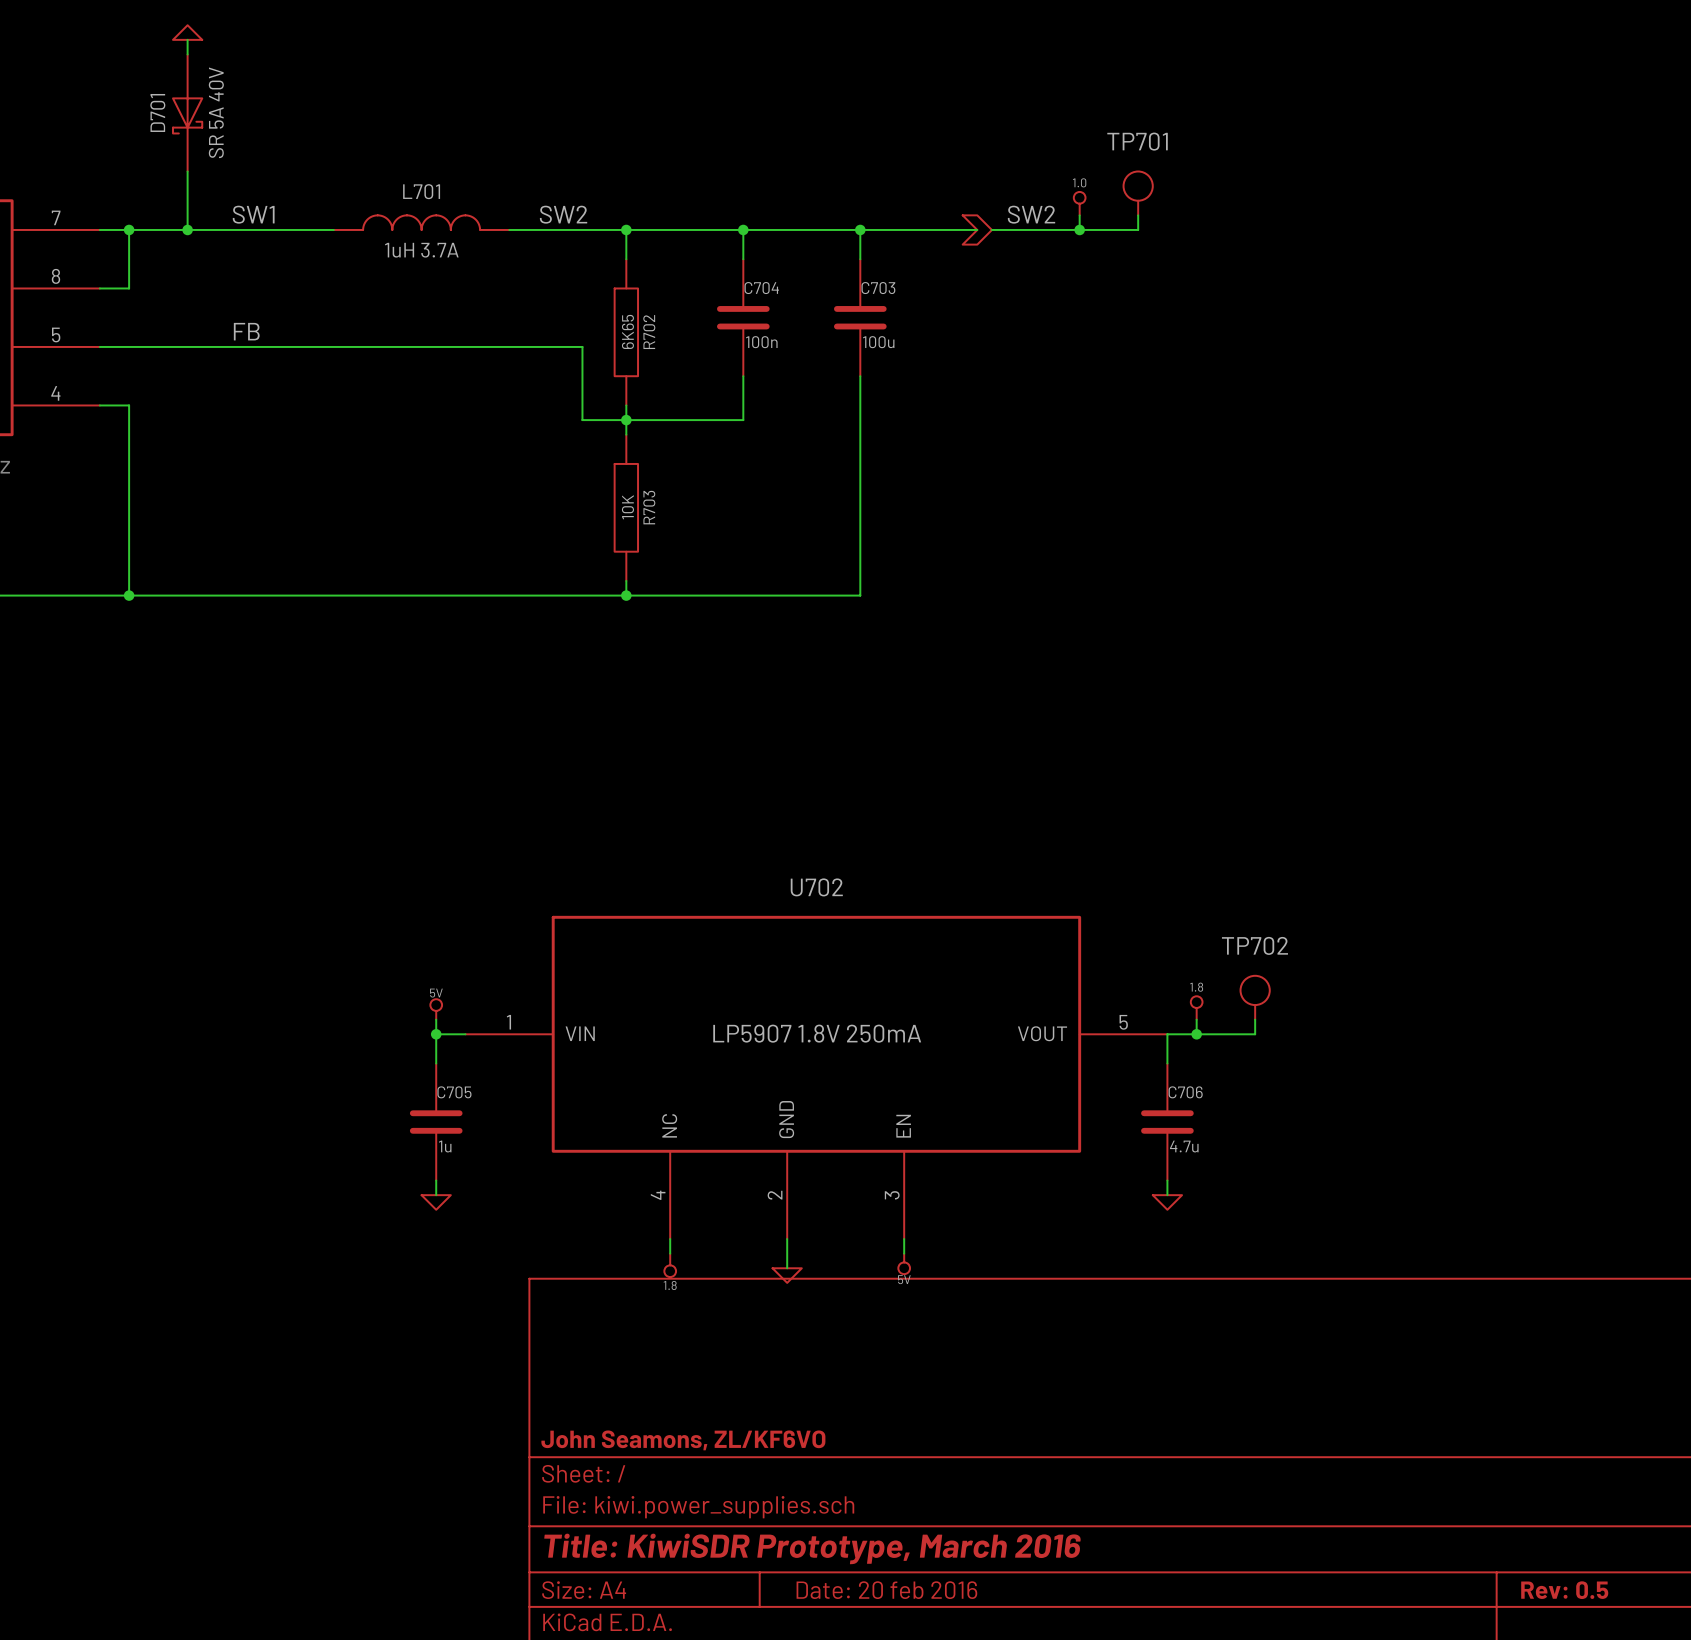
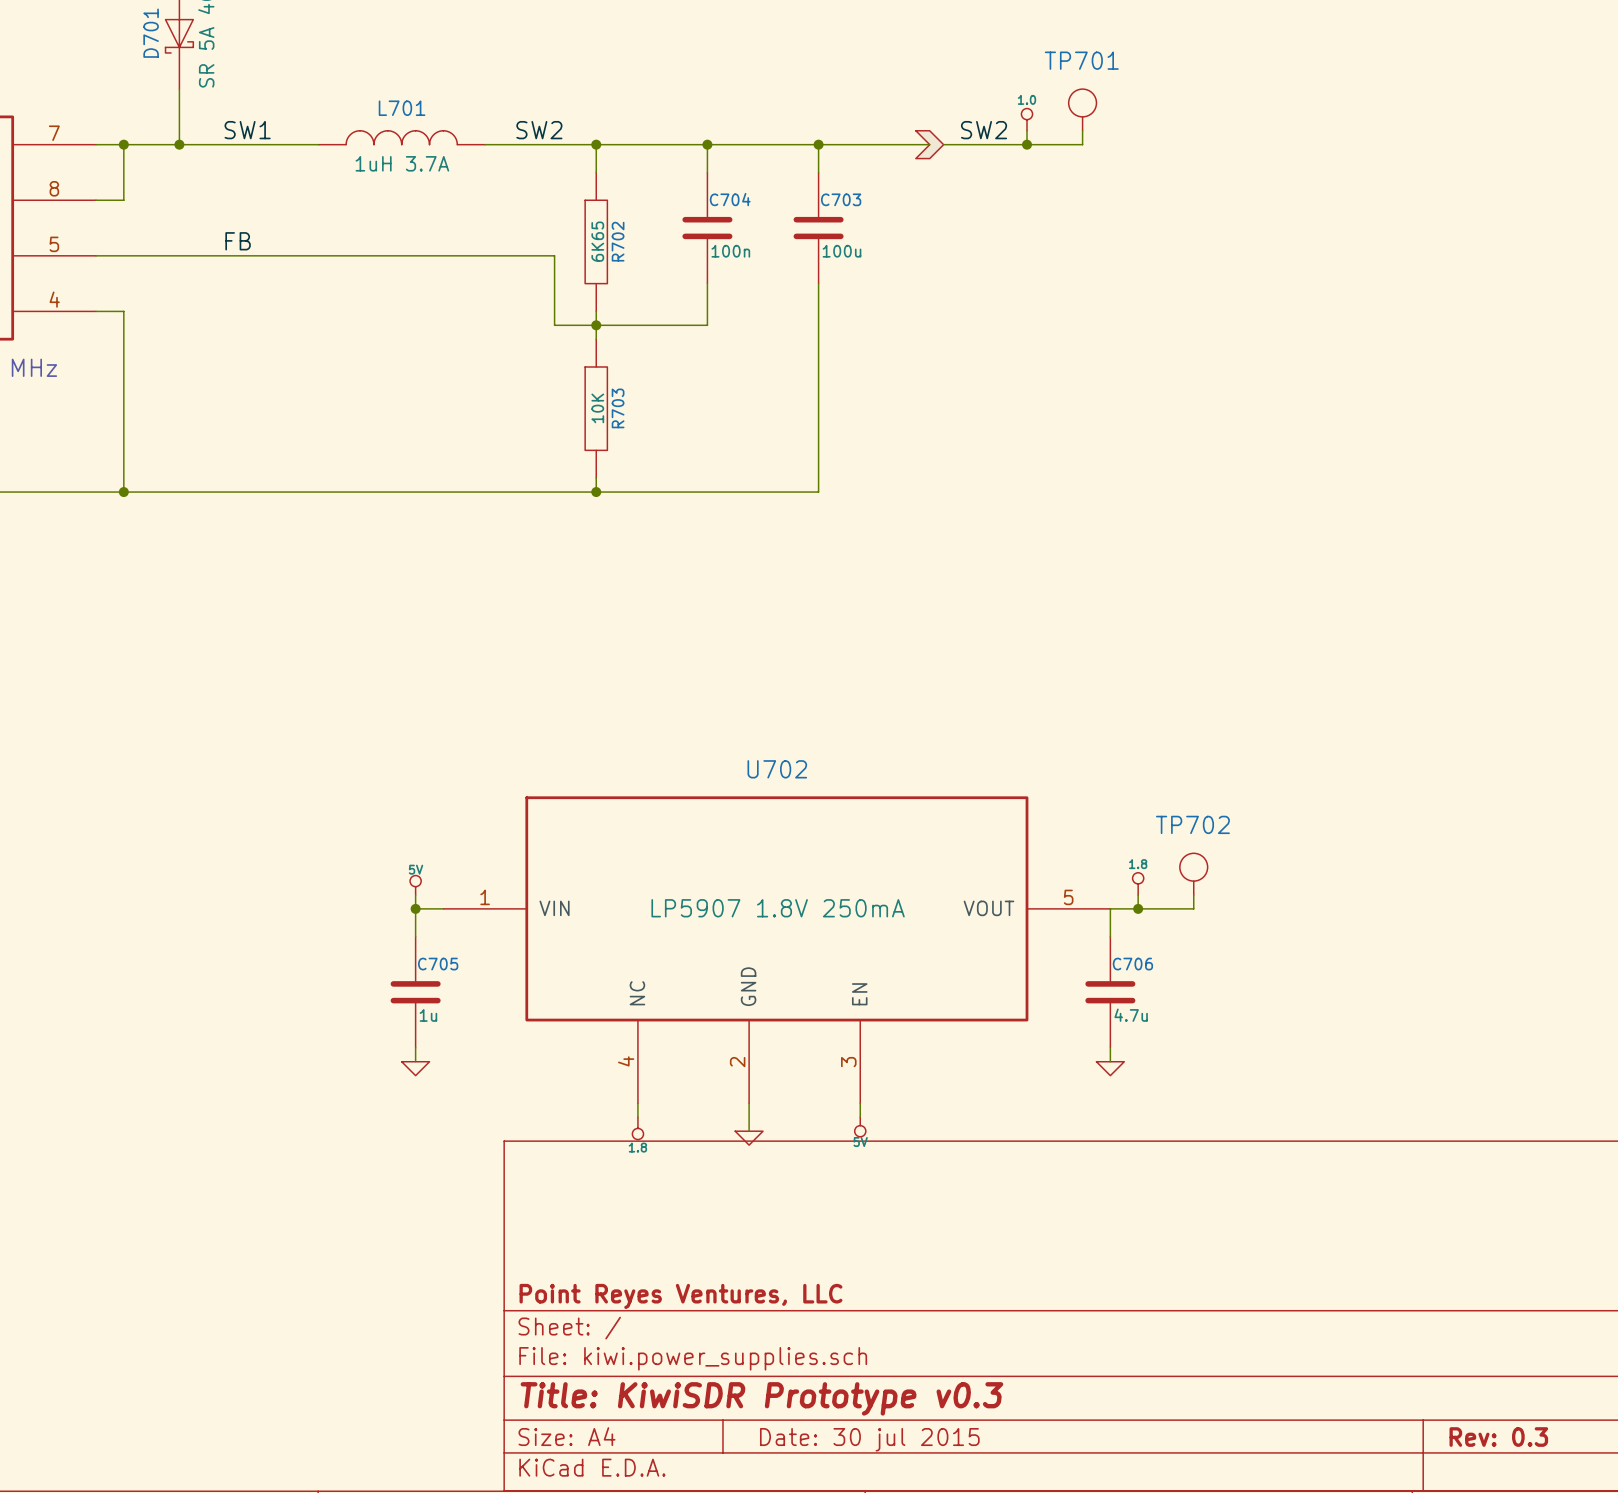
title block: John Seamons, ZL/KF6VO (683, 1440) -> Point Reyes Ventures, LLC (680, 1296)
title block: Title: KiwiSDR Prototype, March 2016 (812, 1548) -> Title: KiwiSDR Prototype v0.3 (761, 1398)
title block: Date: 20 feb 2016 (886, 1590) -> Date: 30 jul 2015 (869, 1439)
title block: Rev: 0.5 (1564, 1590) -> Rev: 0.3 (1498, 1437)

